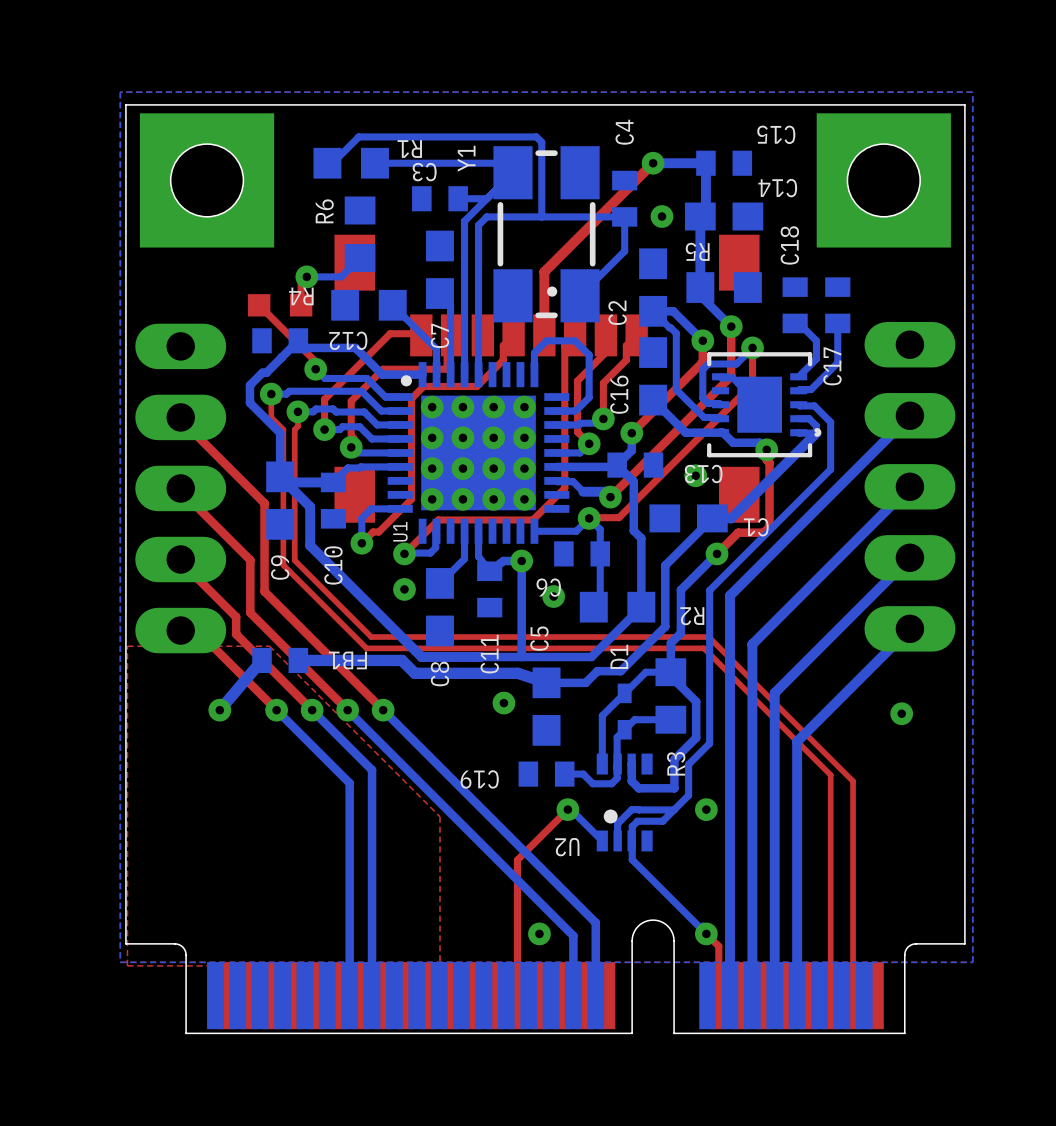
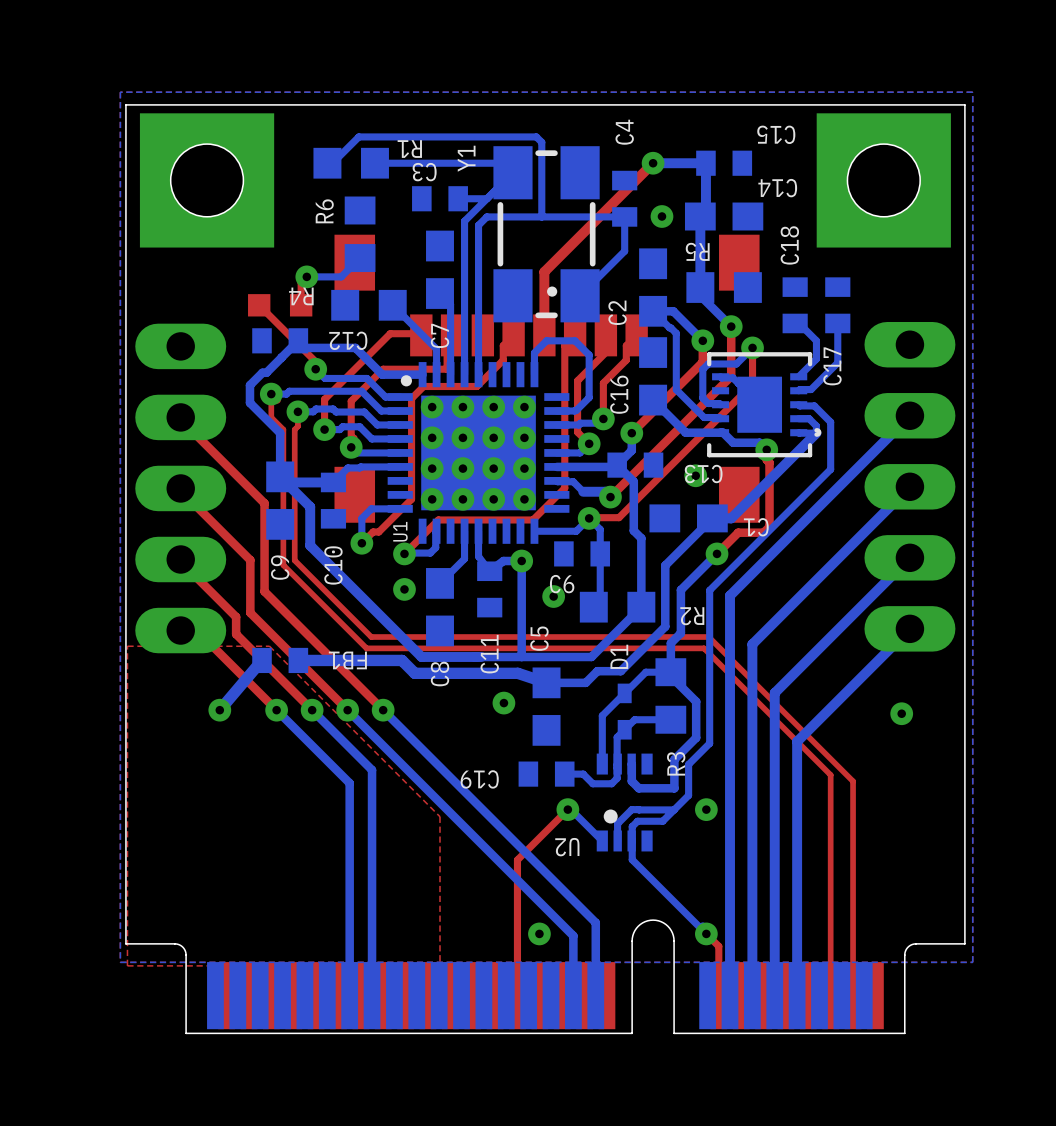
C6 name rotation: 0° (548, 587) -> 180° (562, 584)

